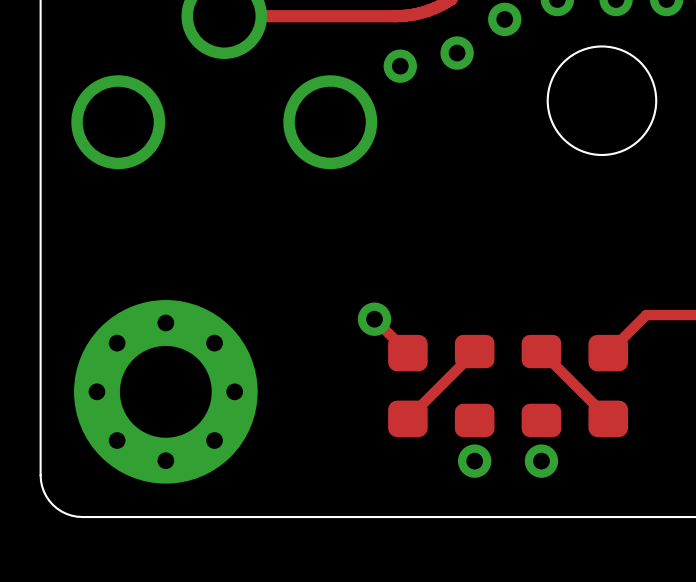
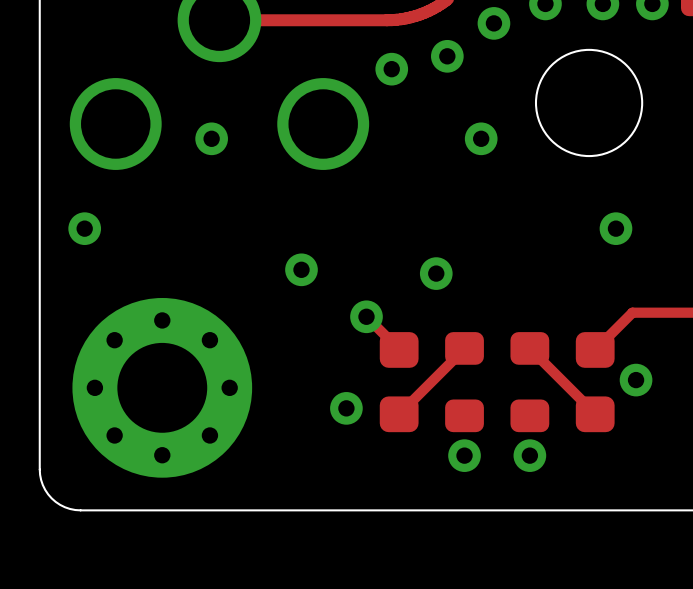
via: none -> (211, 138)
via: none -> (481, 138)
via: none -> (84, 228)
via: none -> (615, 228)
via: none -> (301, 269)
via: none -> (436, 273)
via: none -> (636, 380)
via: none -> (346, 408)

